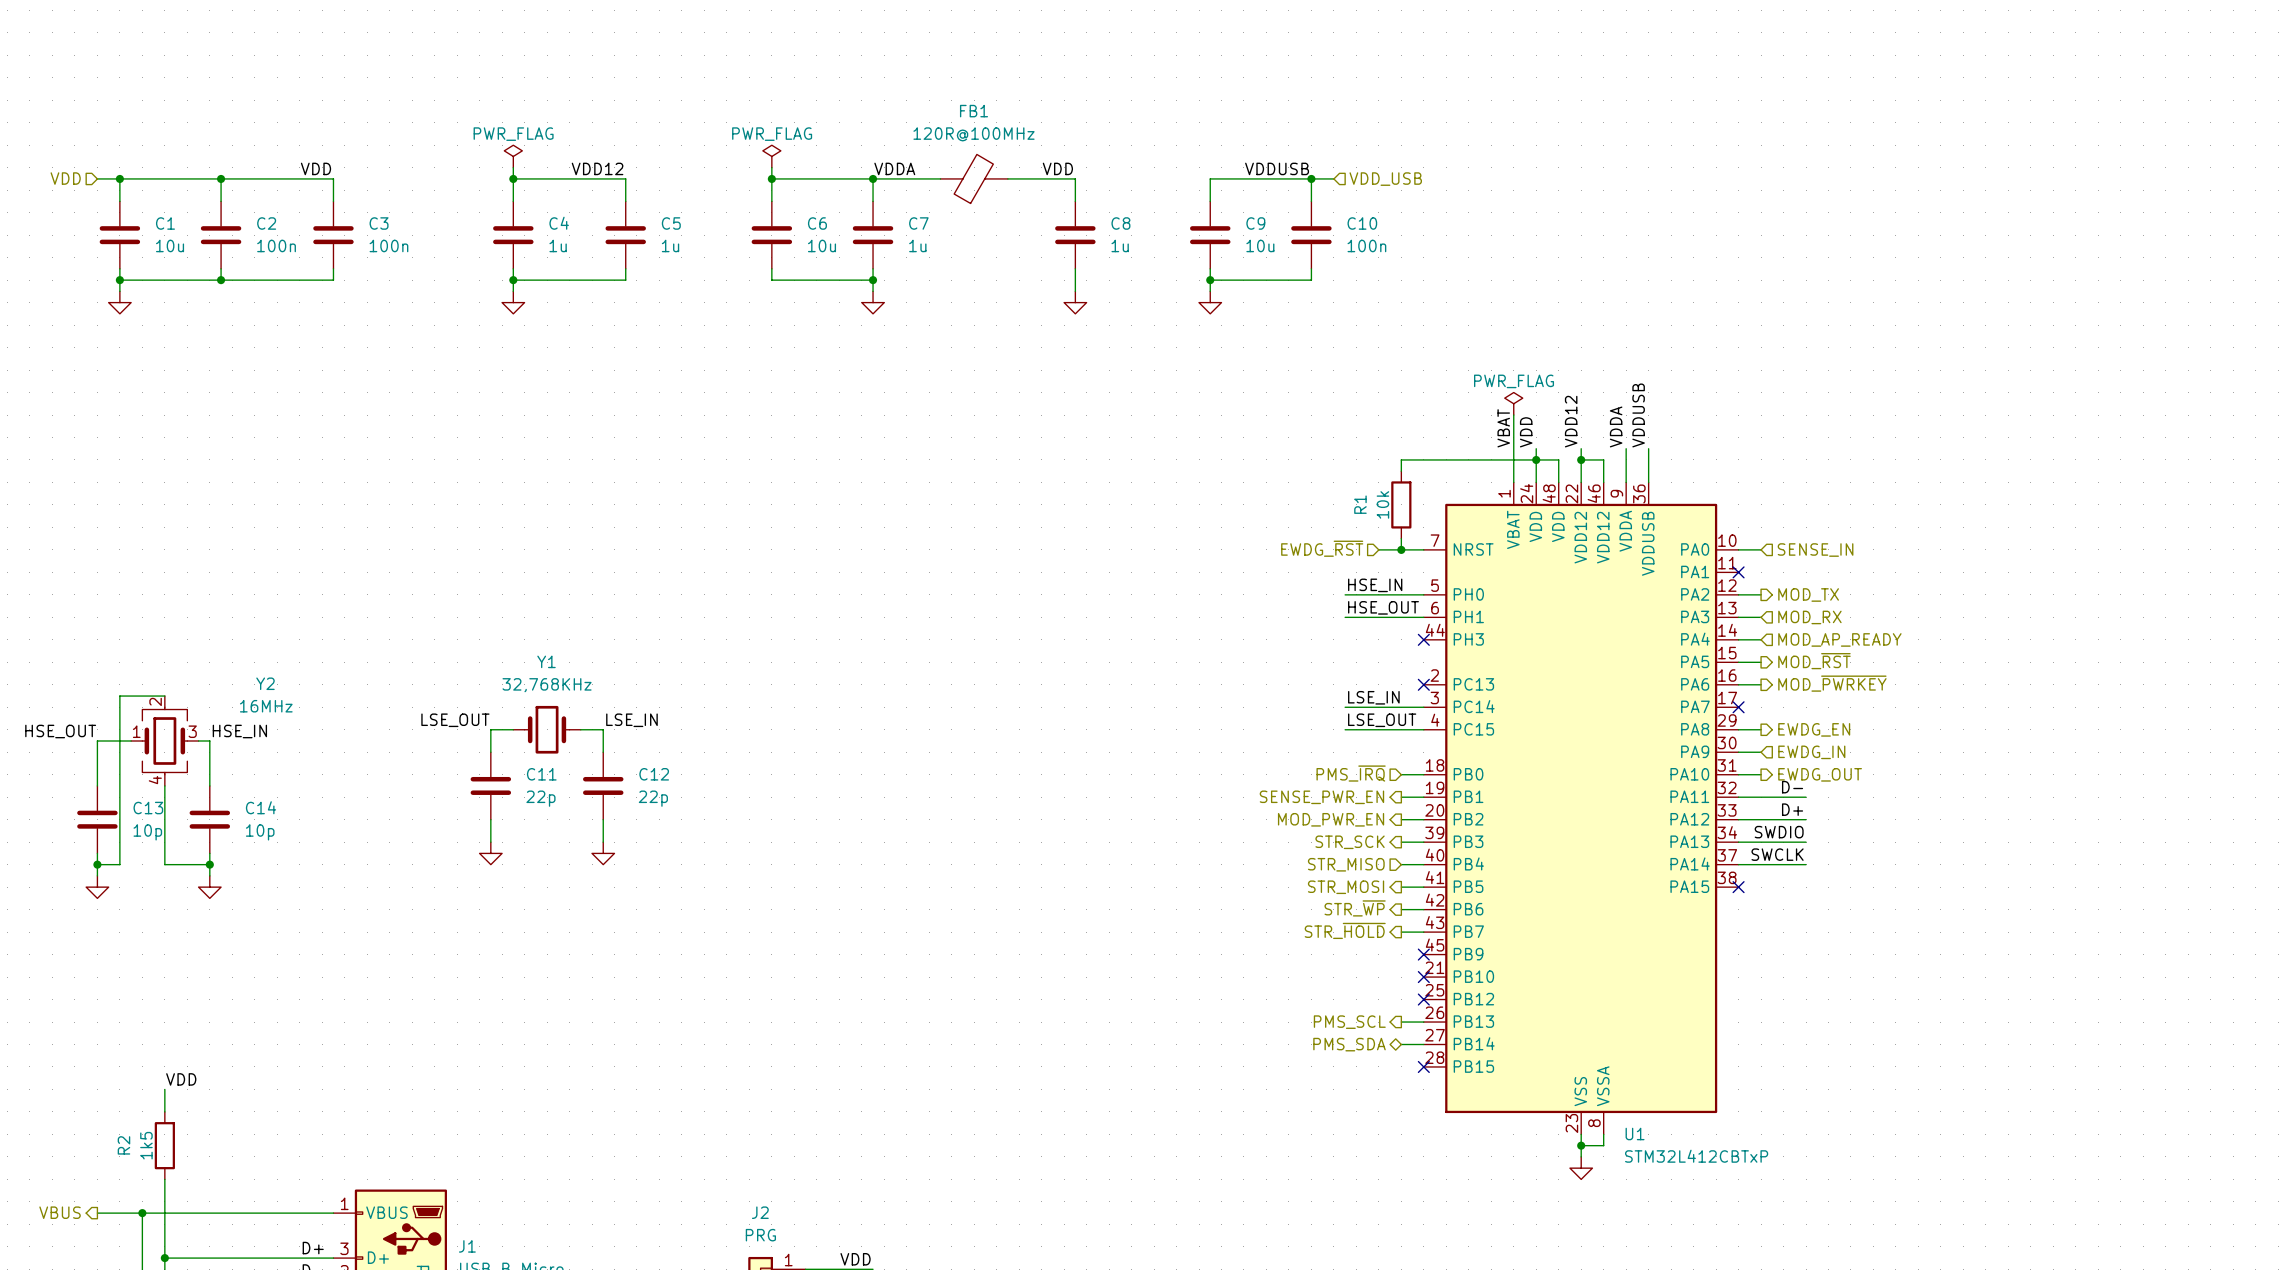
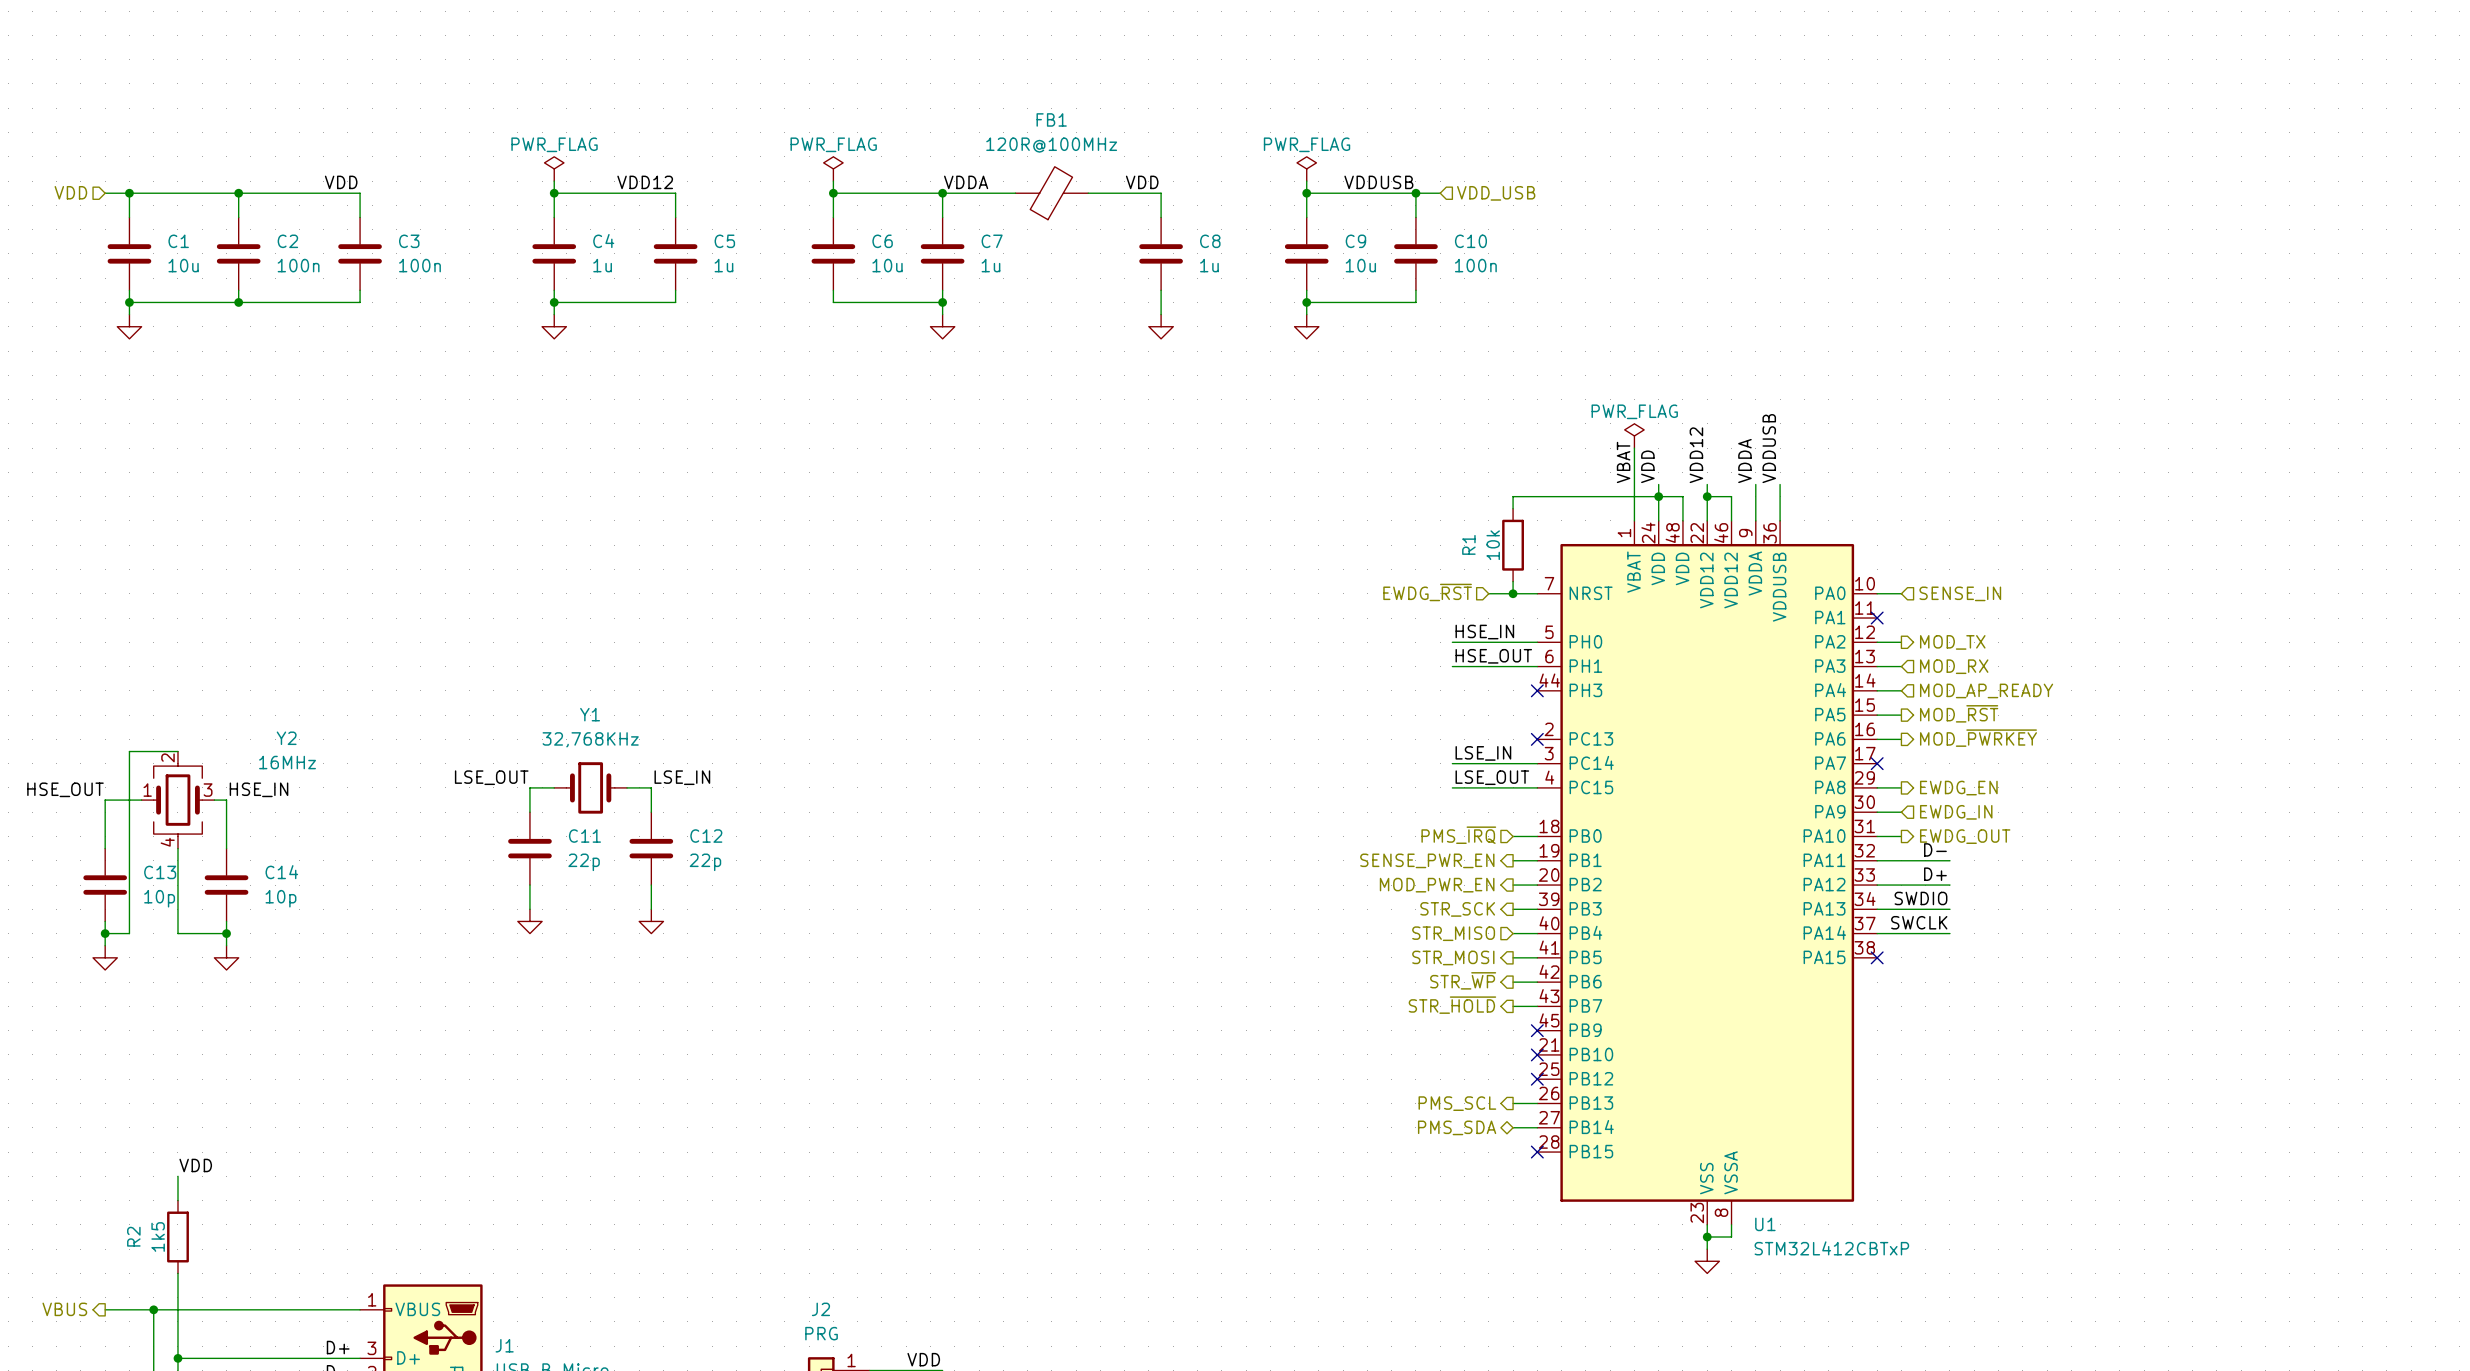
power symbol: none -> PWR_FLAG (1306, 168)
wire: none -> (1306, 181) (1306, 193)
junction: none -> (1306, 193)

